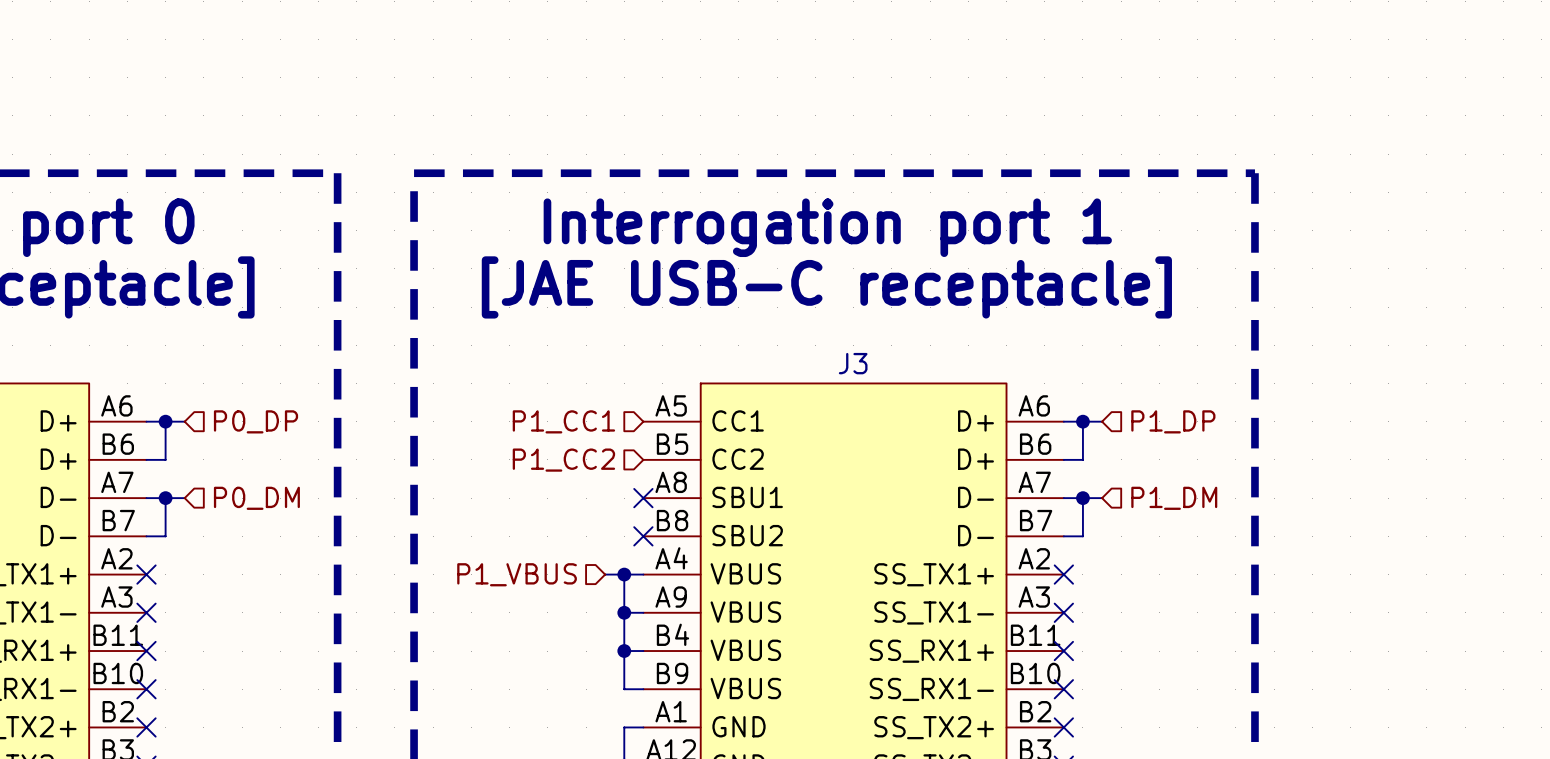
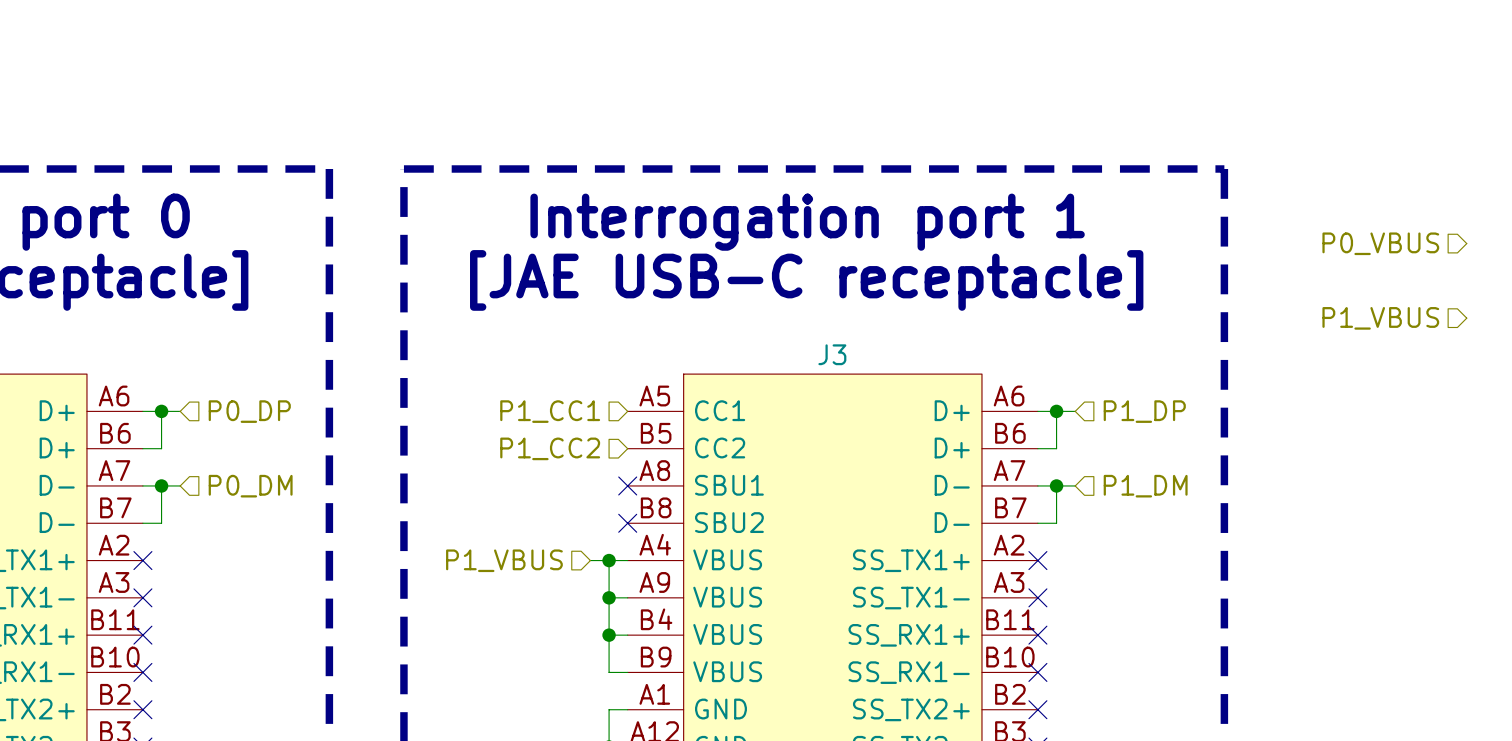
hierarchical label: none -> P0_VBUS (1380, 243)
hierarchical label: none -> P1_VBUS (1380, 318)

